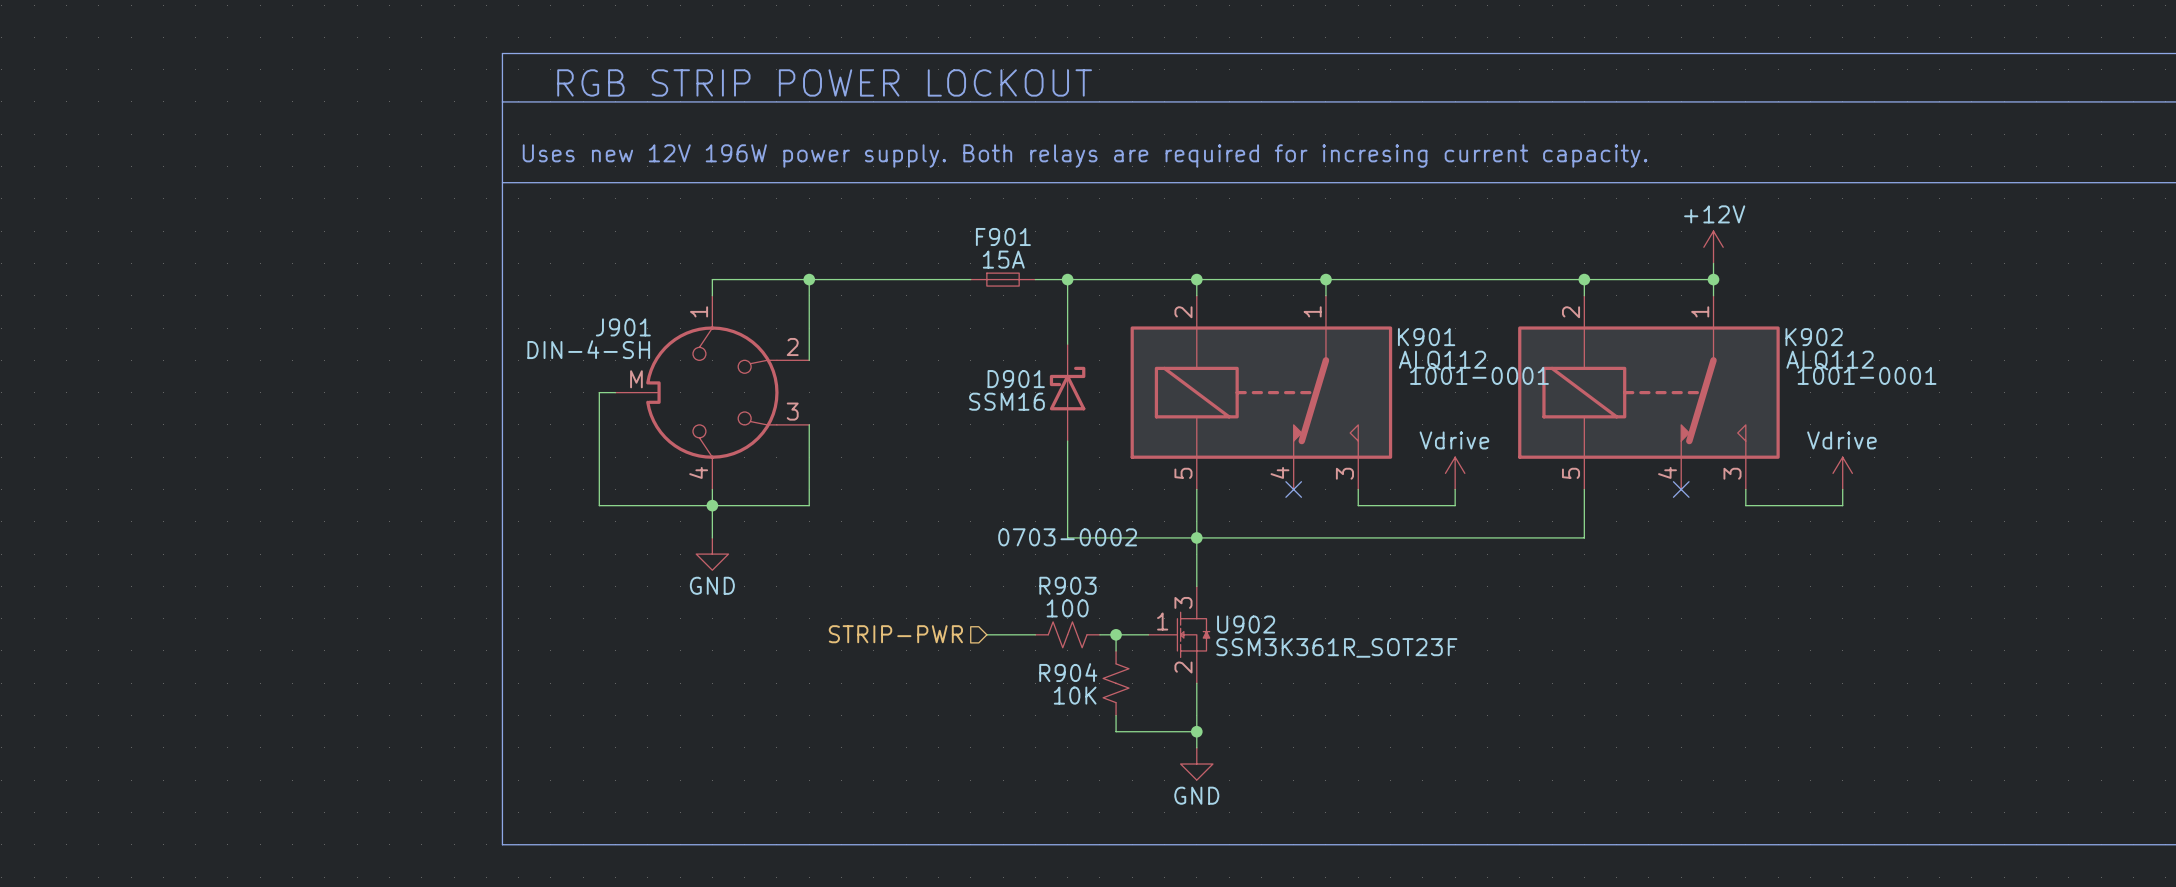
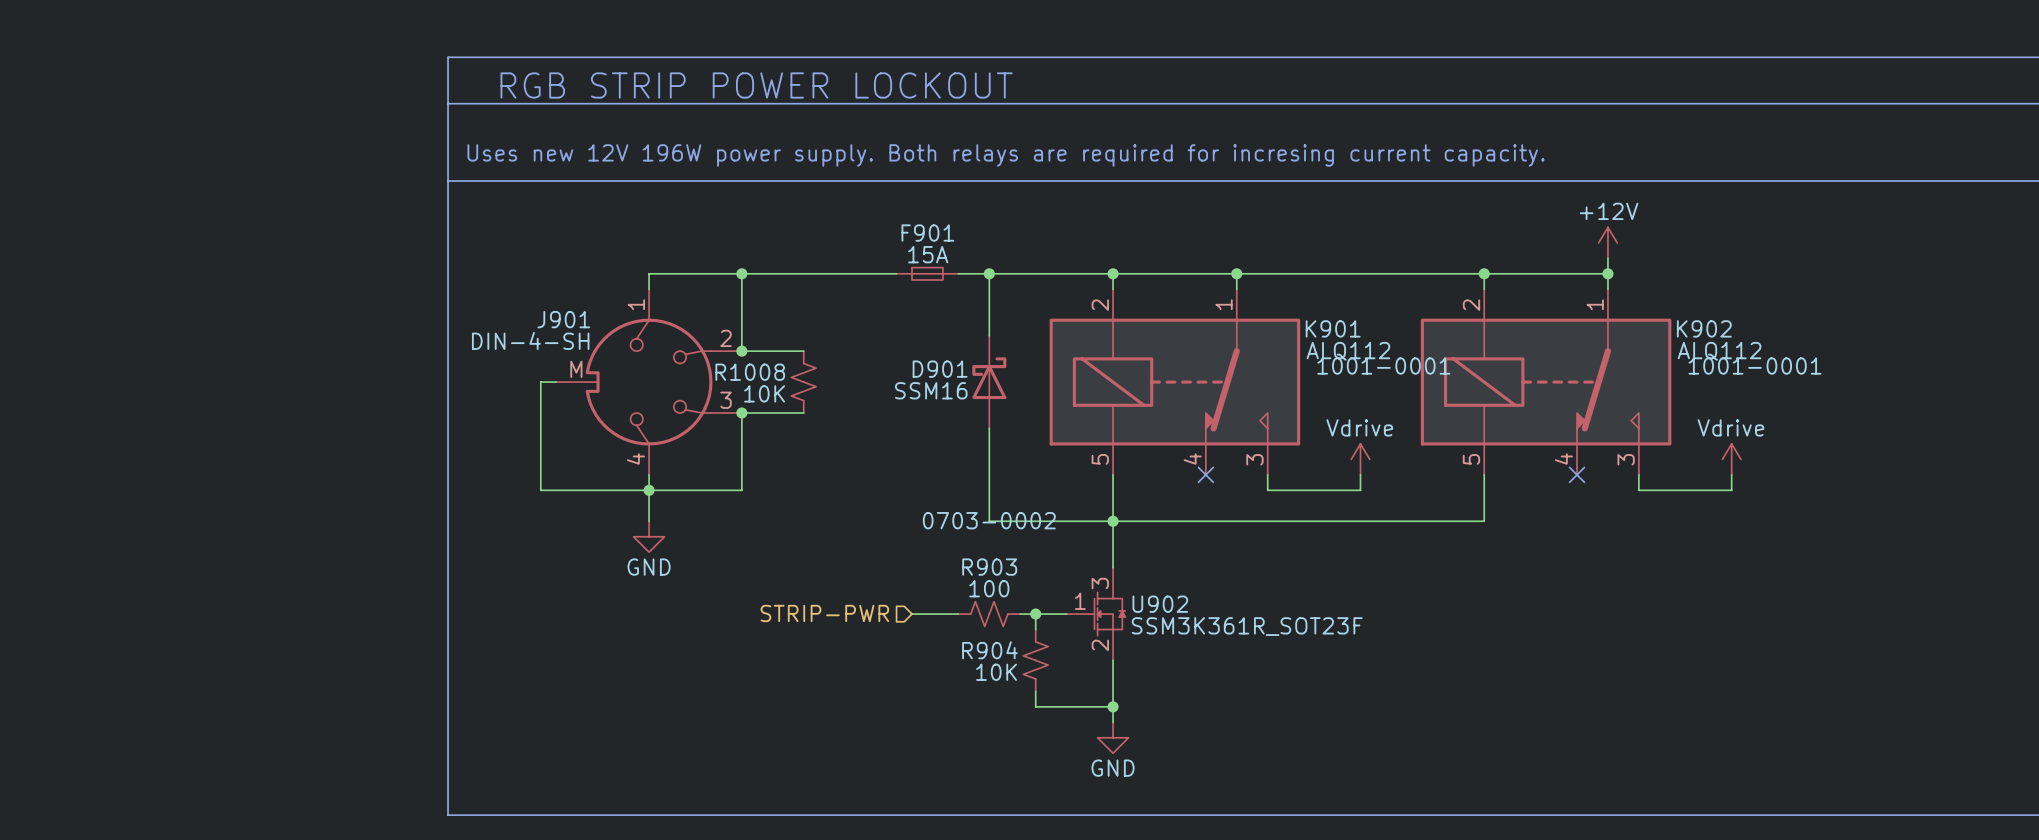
wire: none -> (741, 351) (803, 351)
junction: none -> (741, 351)
R1008: none -> 10K (803, 382)
wire: none -> (741, 413) (803, 413)
junction: none -> (741, 413)

